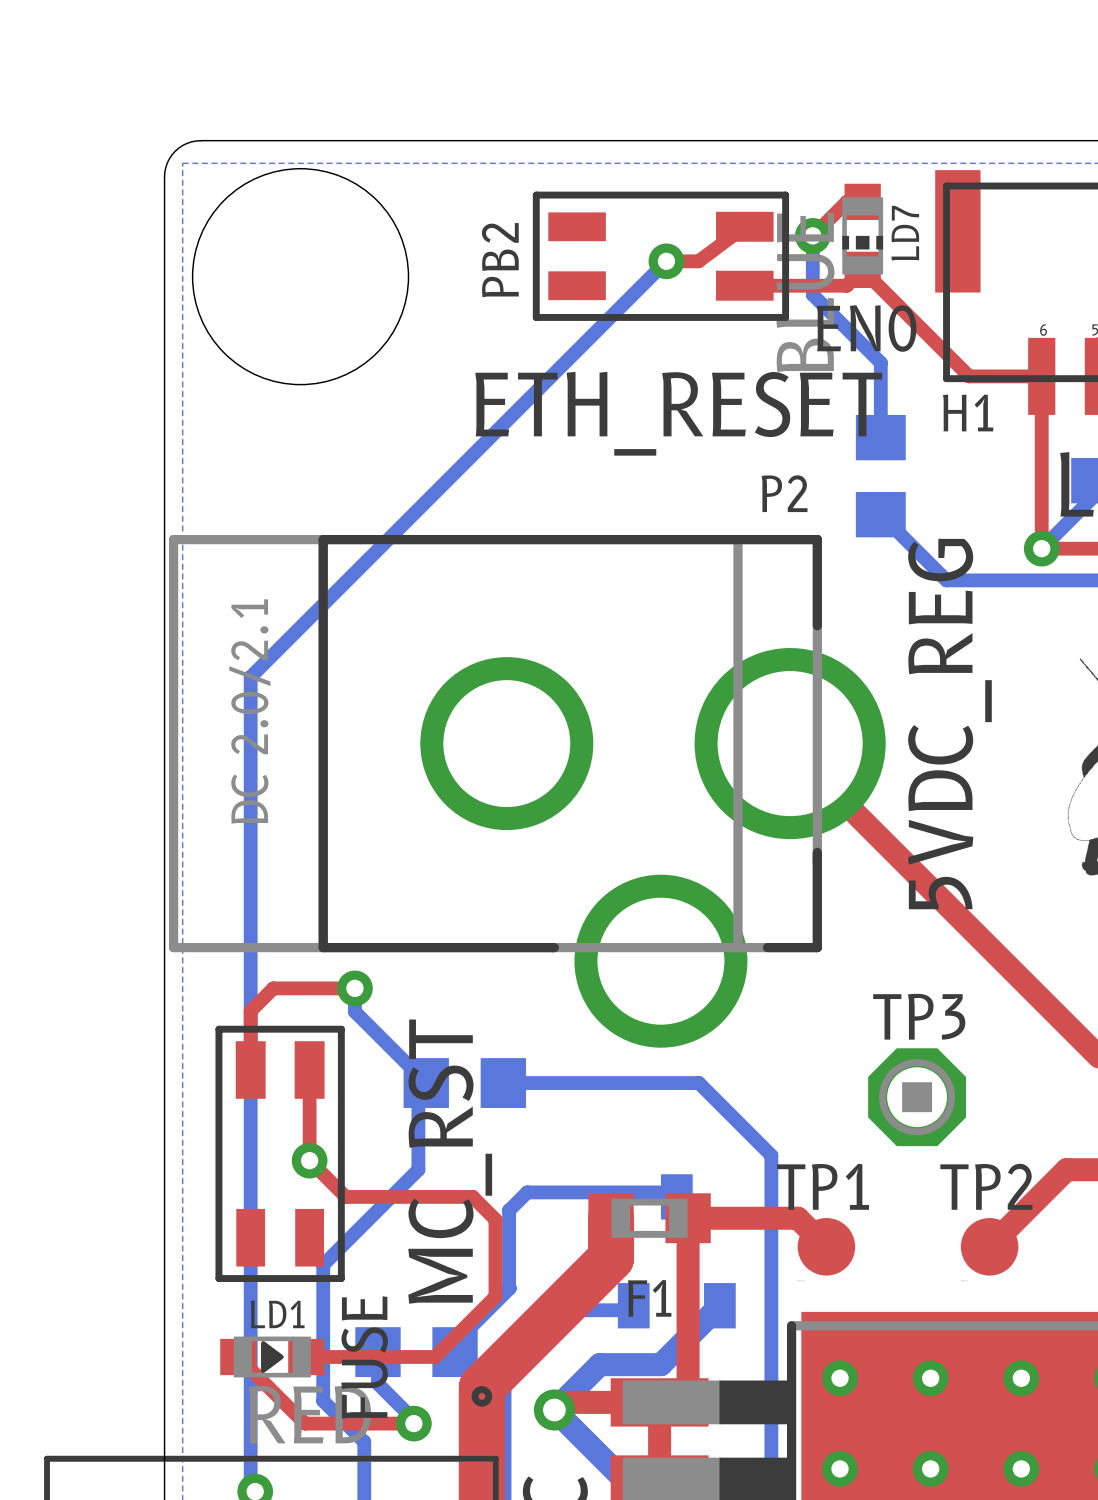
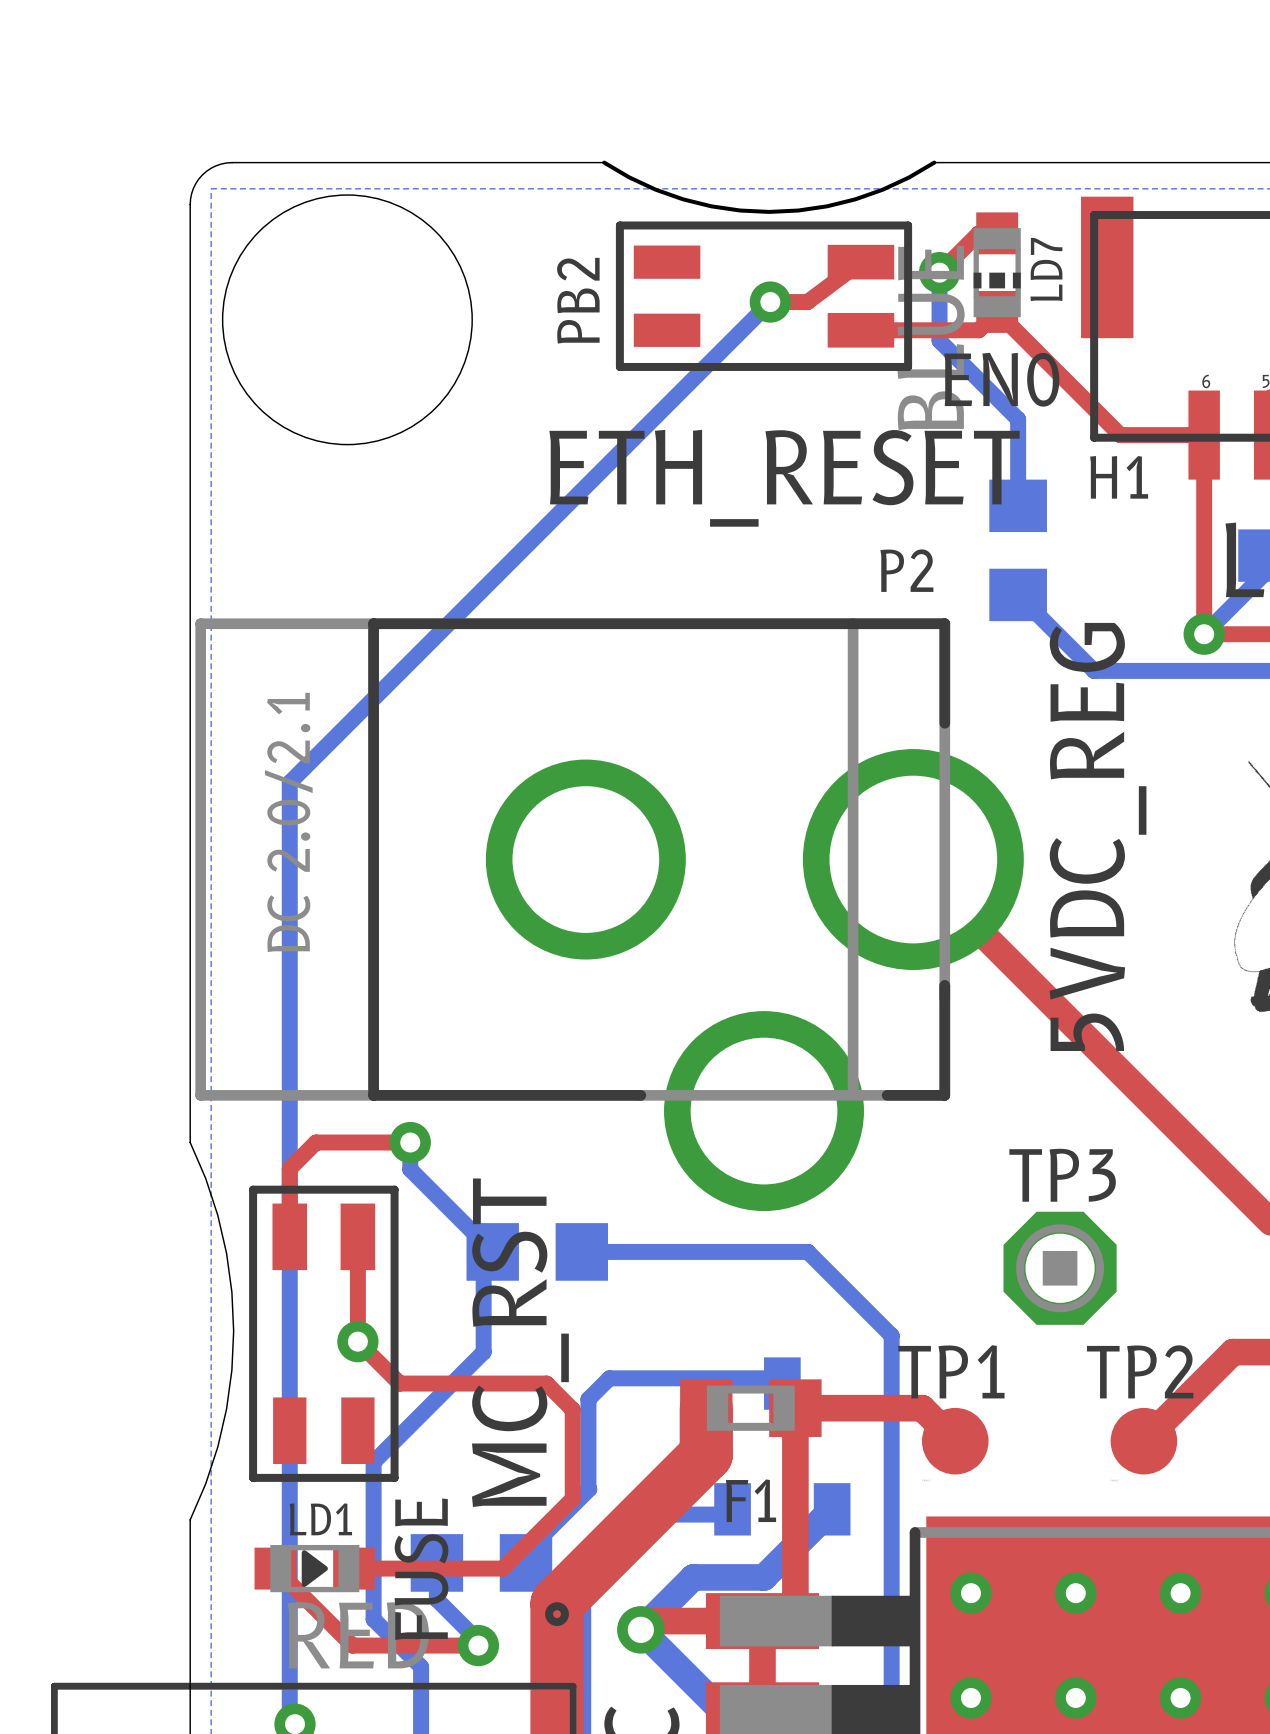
board edge: (522, 140) (808, 140) -> (604, 162) (629, 177) (683, 199) (711, 206) (769, 211) (827, 206) (855, 199) (909, 177) (934, 162)
board edge: (164, 988) (164, 1314) -> (190, 1142) (205, 1178) (217, 1215) (226, 1253) (231, 1292) (233, 1331) (231, 1370) (226, 1408) (217, 1446) (205, 1483) (190, 1519)

